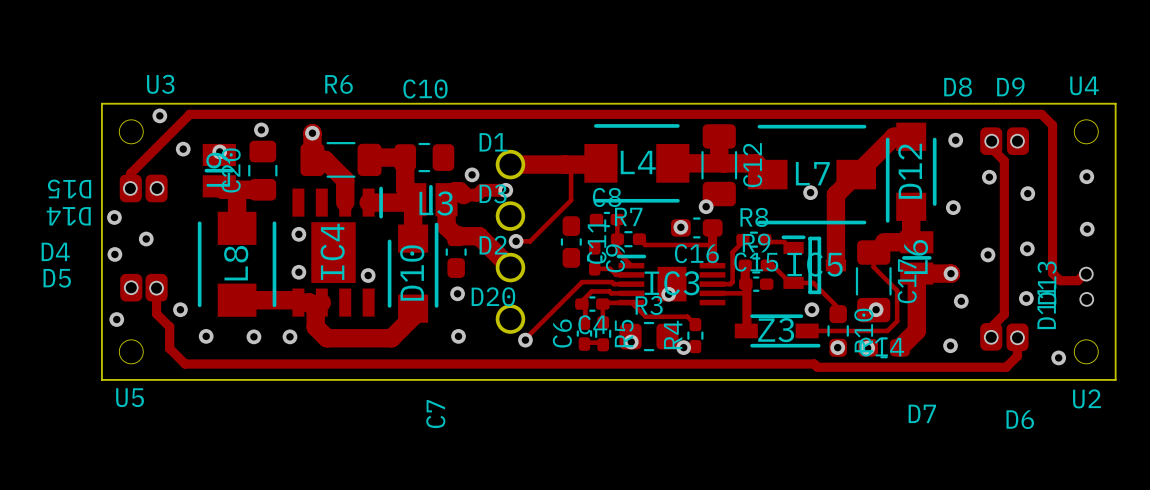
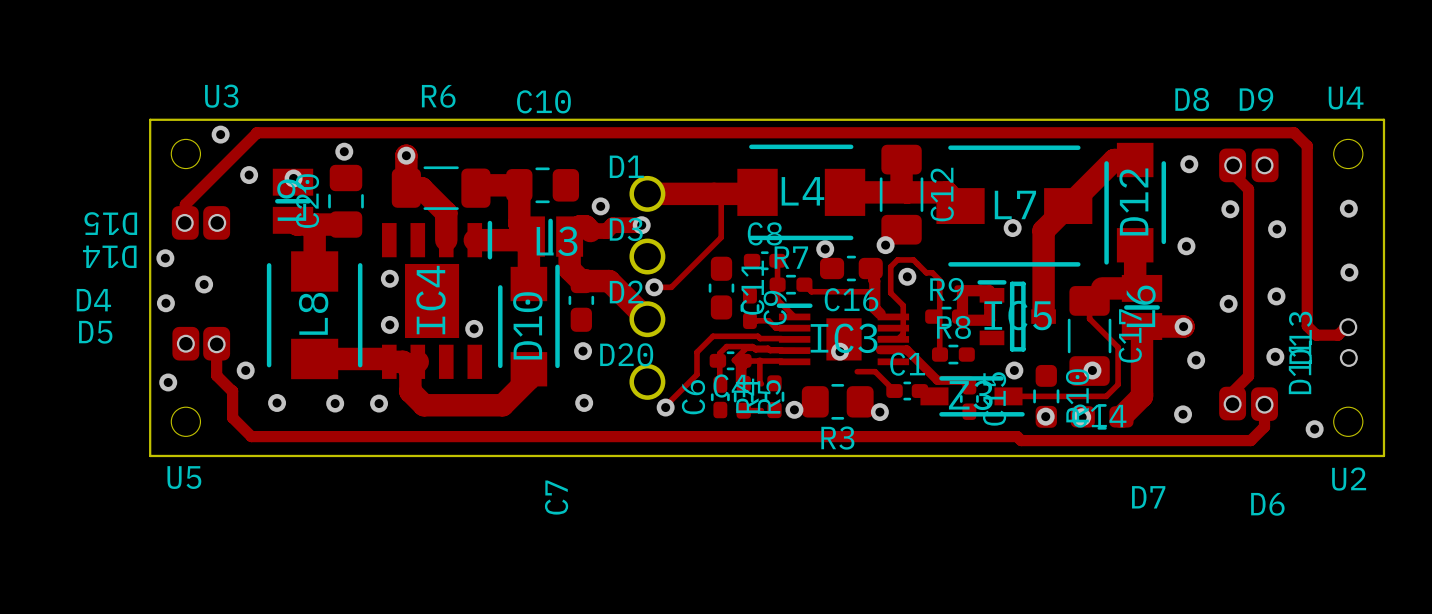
via: none -> (825, 249)
track: none -> (873, 268) (874, 308) (880, 313)
via: (680, 227) -> none
C16 position: (696, 227) -> (851, 268)
track: (712, 228) (712, 263) -> none
via: none -> (907, 276)
R8 position: (753, 239) -> (953, 354)
track: (742, 242) (732, 252) (732, 281) (730, 284) (712, 284) -> none
track: (695, 244) (712, 244) -> none
track: none -> (962, 290) (989, 291) (989, 320) (966, 320) (962, 323) (962, 290)
track: (767, 263) (770, 263) (790, 282) (813, 282) (838, 308) -> none
track: (745, 265) (746, 330) -> none
track: (582, 282) (551, 313) -> (781, 338) (760, 338) (757, 336) (712, 336) (696, 352) (696, 374)
track: (582, 282) (631, 284) -> none
track: none -> (880, 338) (898, 338) (903, 334) (903, 305) (890, 293) (890, 266) (897, 259) (913, 259) (926, 272) (932, 272) (939, 280) (939, 353)
C15 rotation: 0° (756, 284) -> 90° clockwise (969, 398)
C15 position: (756, 284) -> (969, 398)
track: none -> (781, 349) (755, 349) (752, 346) (726, 346) (719, 353) (719, 386)
track: none -> (880, 349) (906, 349) (937, 380) (969, 380)
track: (747, 292) (712, 293) -> none
track: none -> (781, 361) (750, 361) (743, 367) (743, 386)
track: (602, 302) (631, 302) (645, 316) (687, 316) (695, 324) -> none
C4 position: (592, 304) -> (730, 360)
R3 name position: R3 (649, 305) -> R3 (837, 438)
track: none -> (857, 371) (875, 371) (894, 391)
C1: none -> (907, 391)
C6 position: (584, 333) -> (720, 397)
R5 position: (603, 333) -> (743, 397)
R4 position: (695, 335) -> (774, 396)
R3 position: (649, 336) -> (837, 401)
via position: (683, 347) -> (879, 412)

